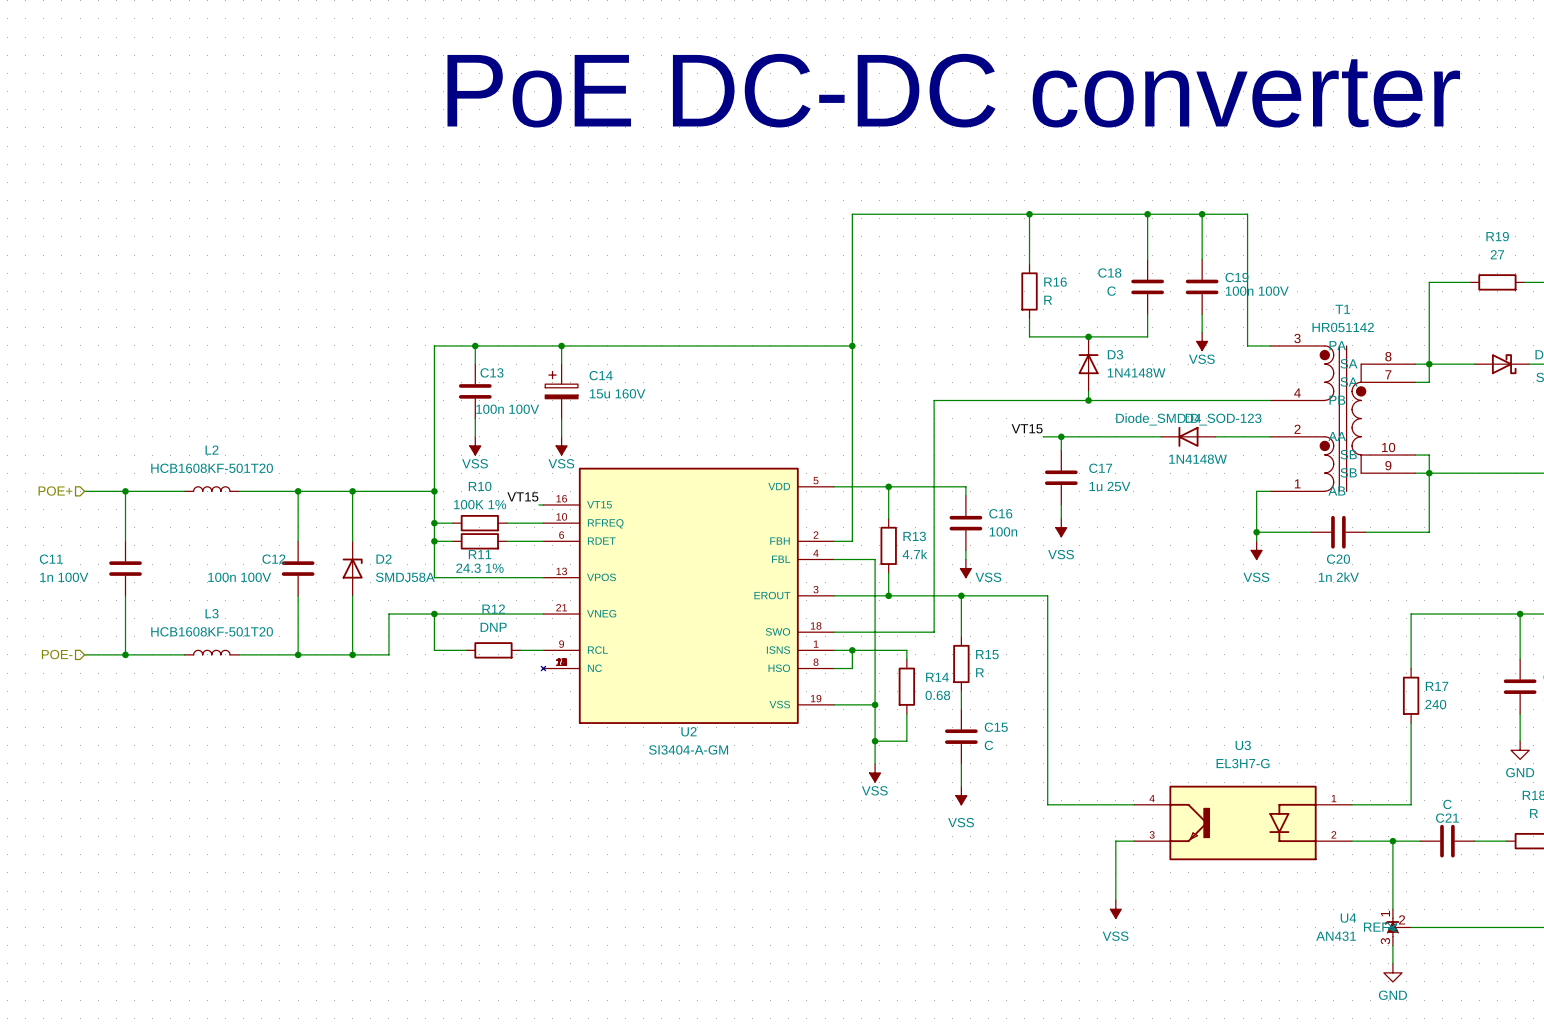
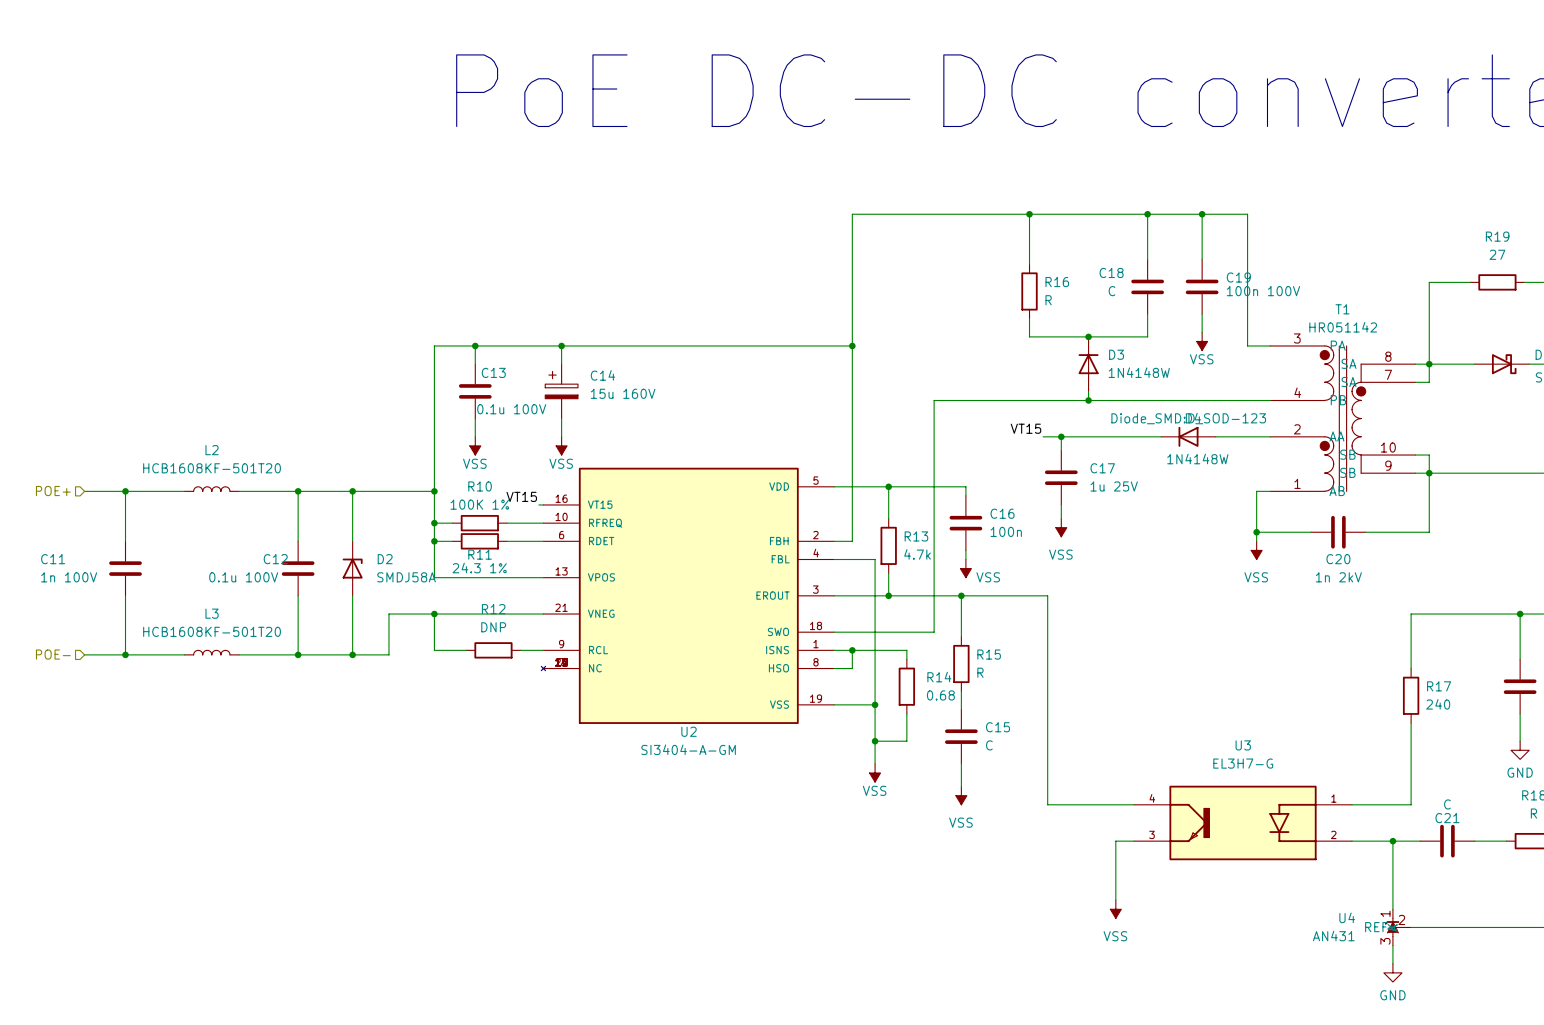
C13 value: 100n 100V (507, 409) -> 0.1u 100V (511, 409)
C12 value: 100n 100V (239, 577) -> 0.1u 100V (243, 577)

